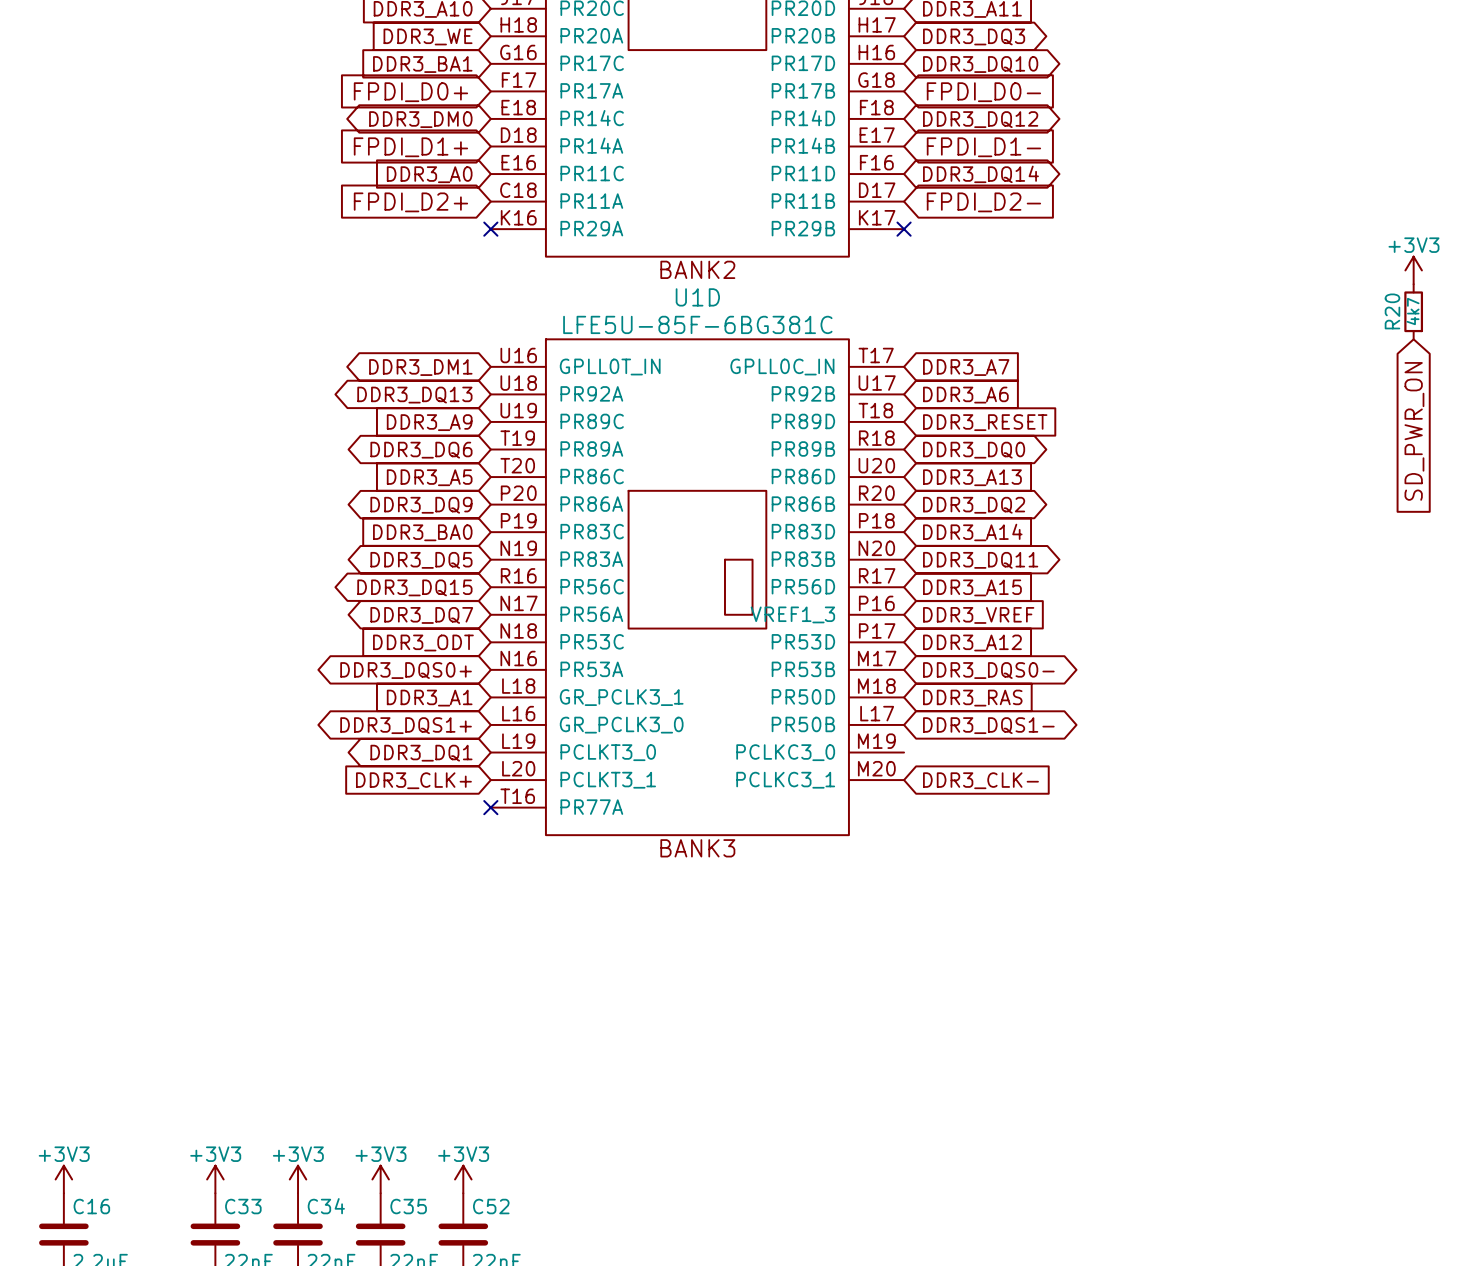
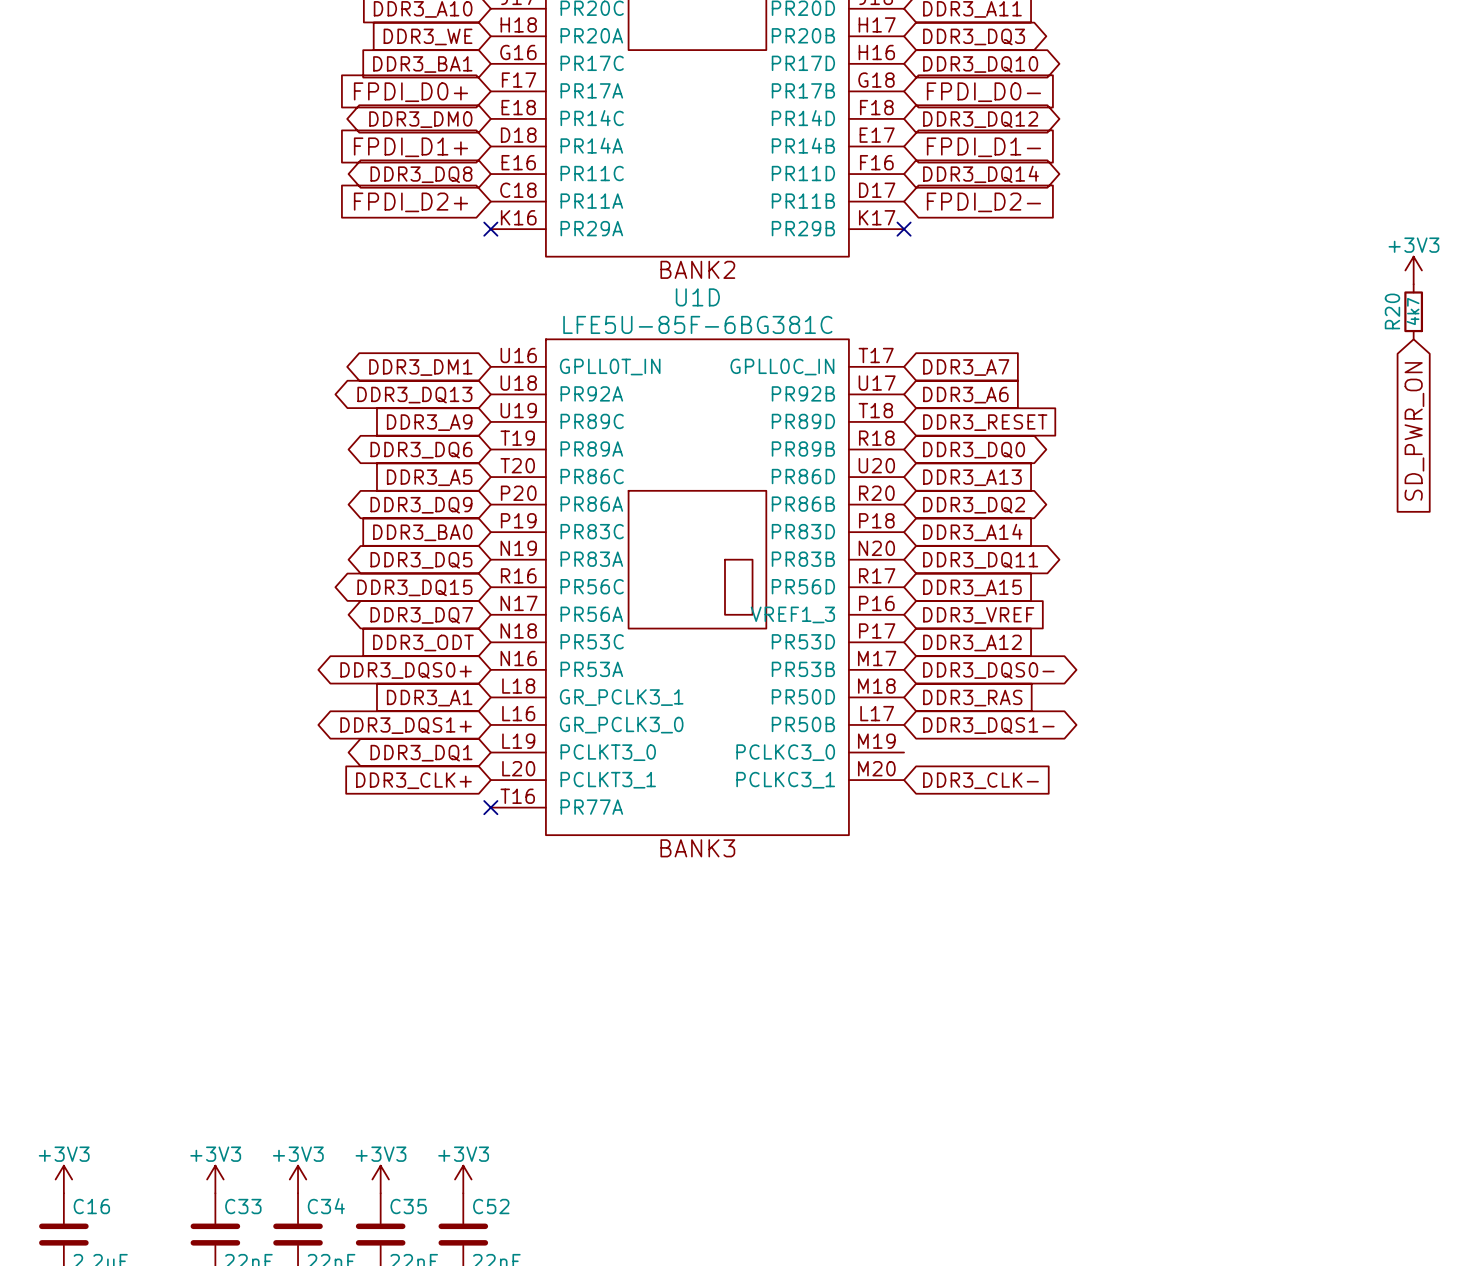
global label shape: input (429, 174) -> bidirectional (421, 174)
global label: DDR3_A0 (429, 174) -> DDR3_DQ8 (421, 174)

